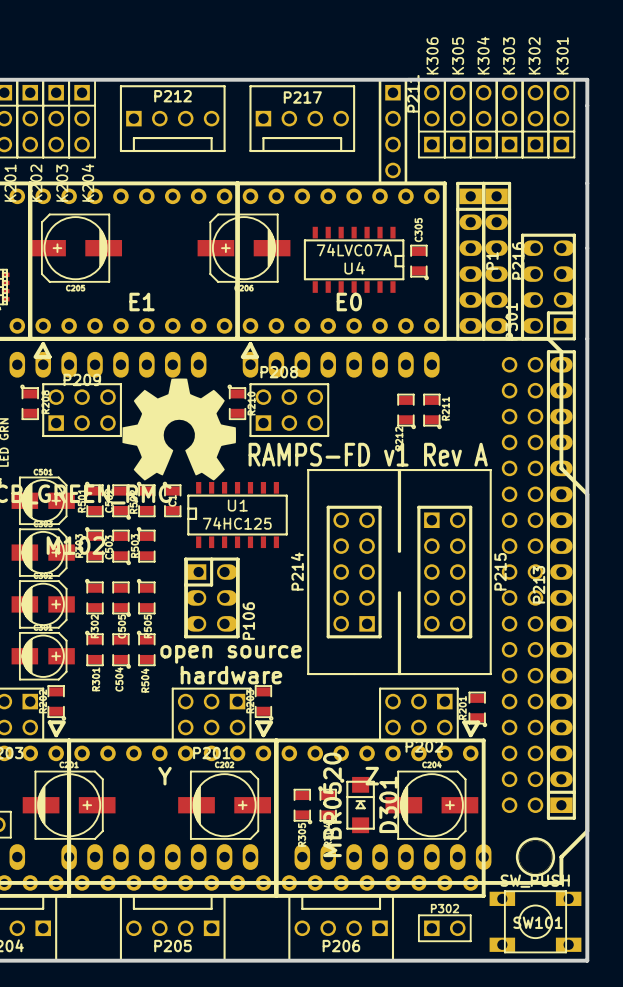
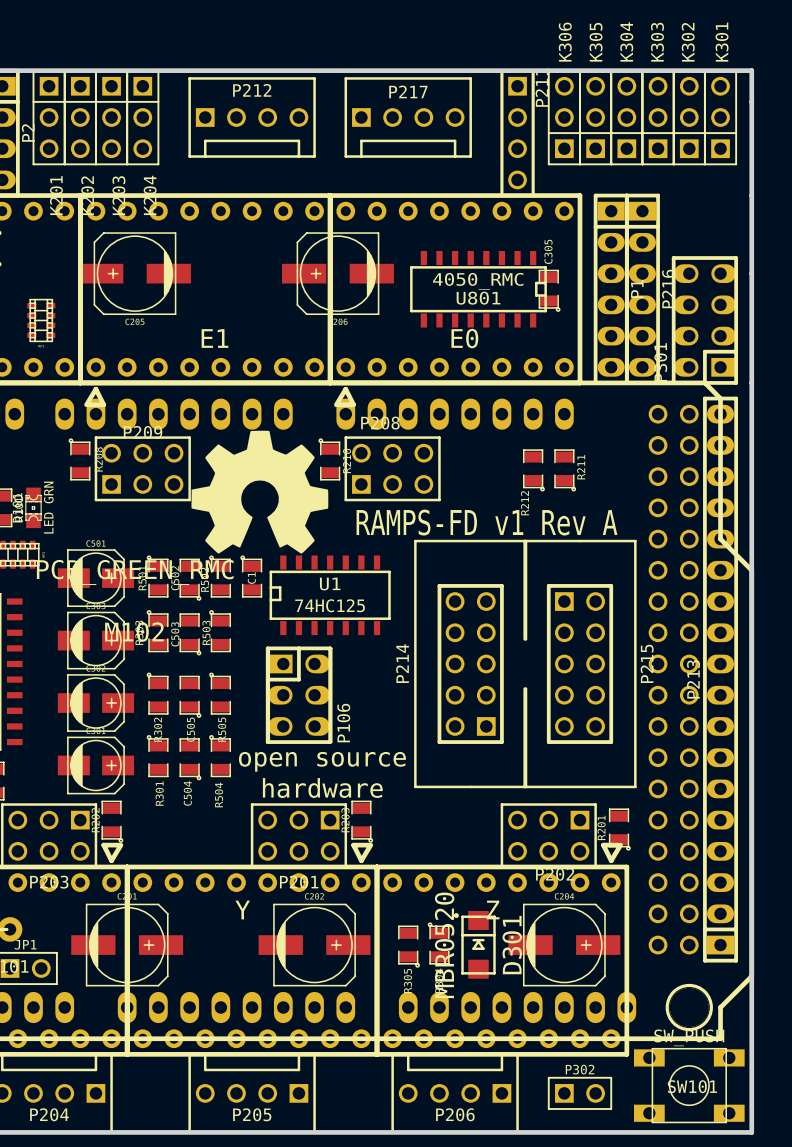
U4: 74LVC07A (354, 259) -> none
U801: none -> 4050_RMC (478, 289)

